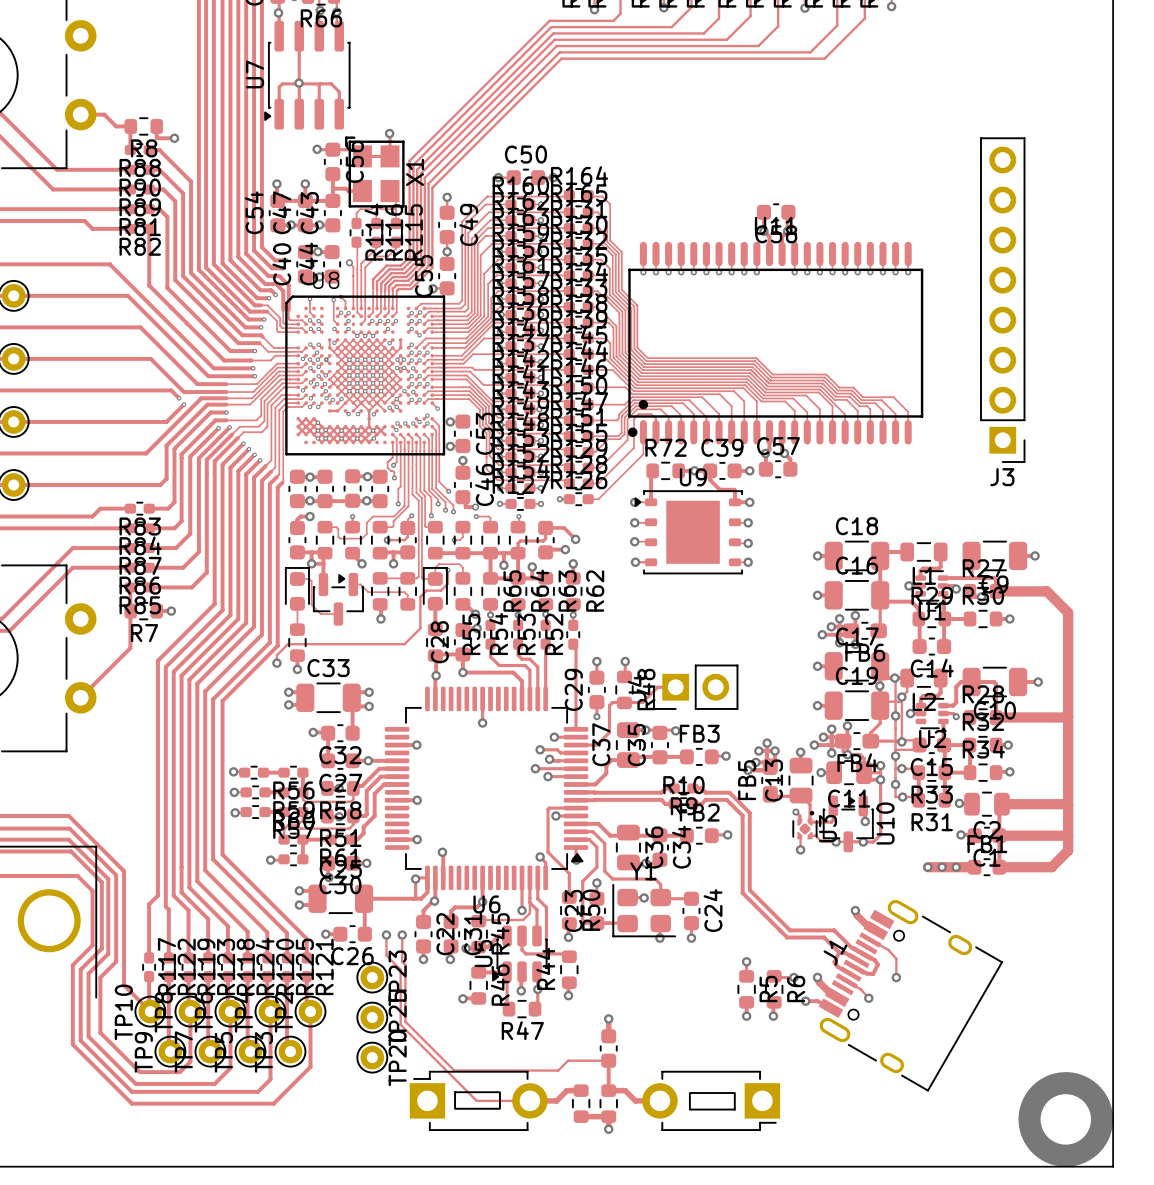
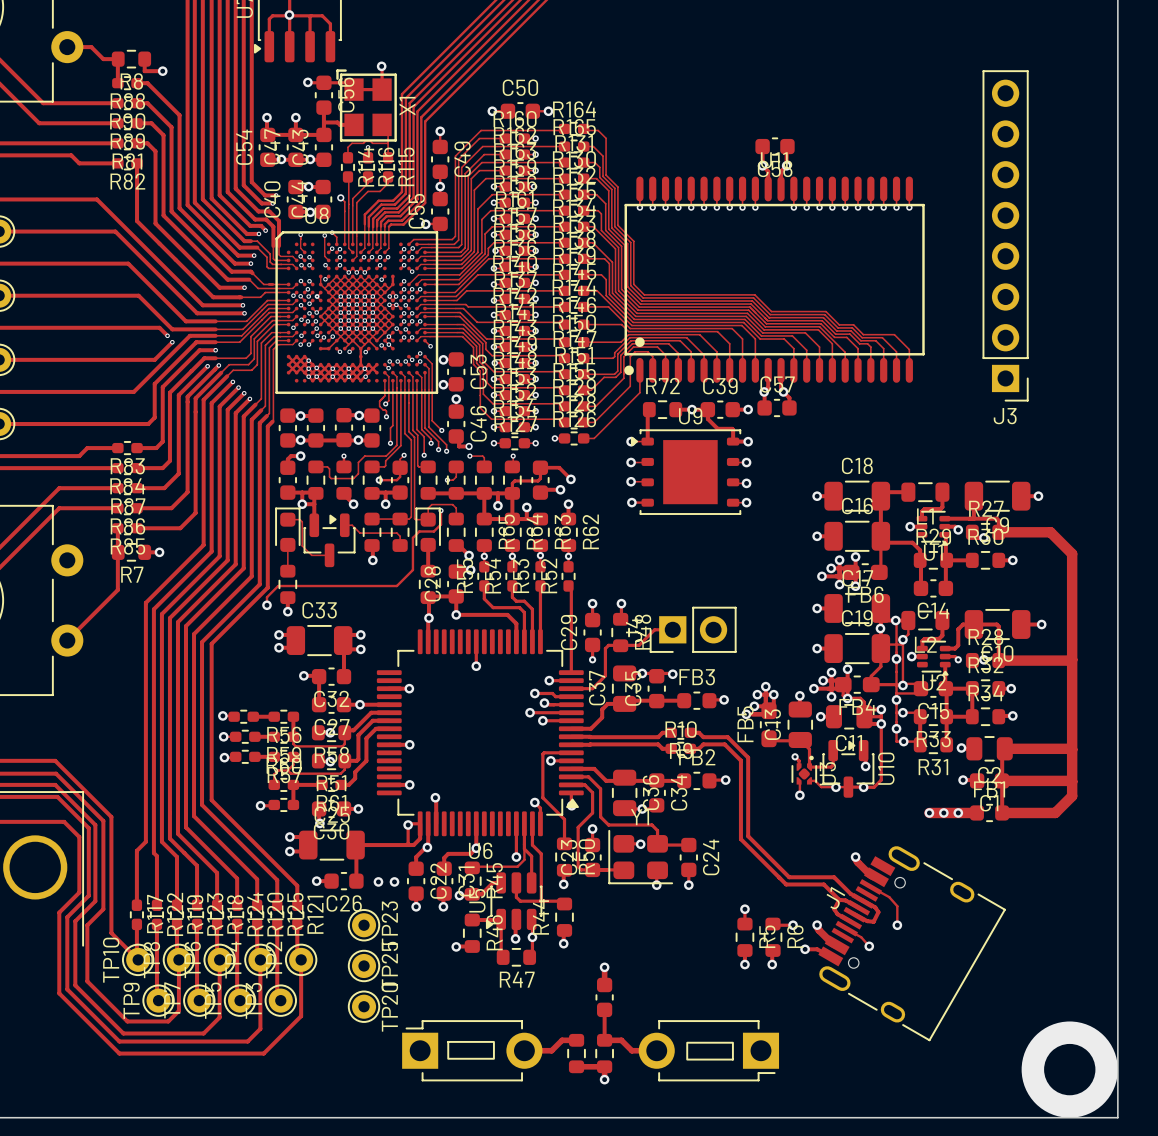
track: (386, 935) (386, 955) (400, 969) (400, 1024) (476, 1100) (529, 1100) -> none
track: (402, 935) (402, 961) (405, 964) (405, 1021) (454, 1070) (558, 1070) (568, 1060) (608, 1060) -> none

